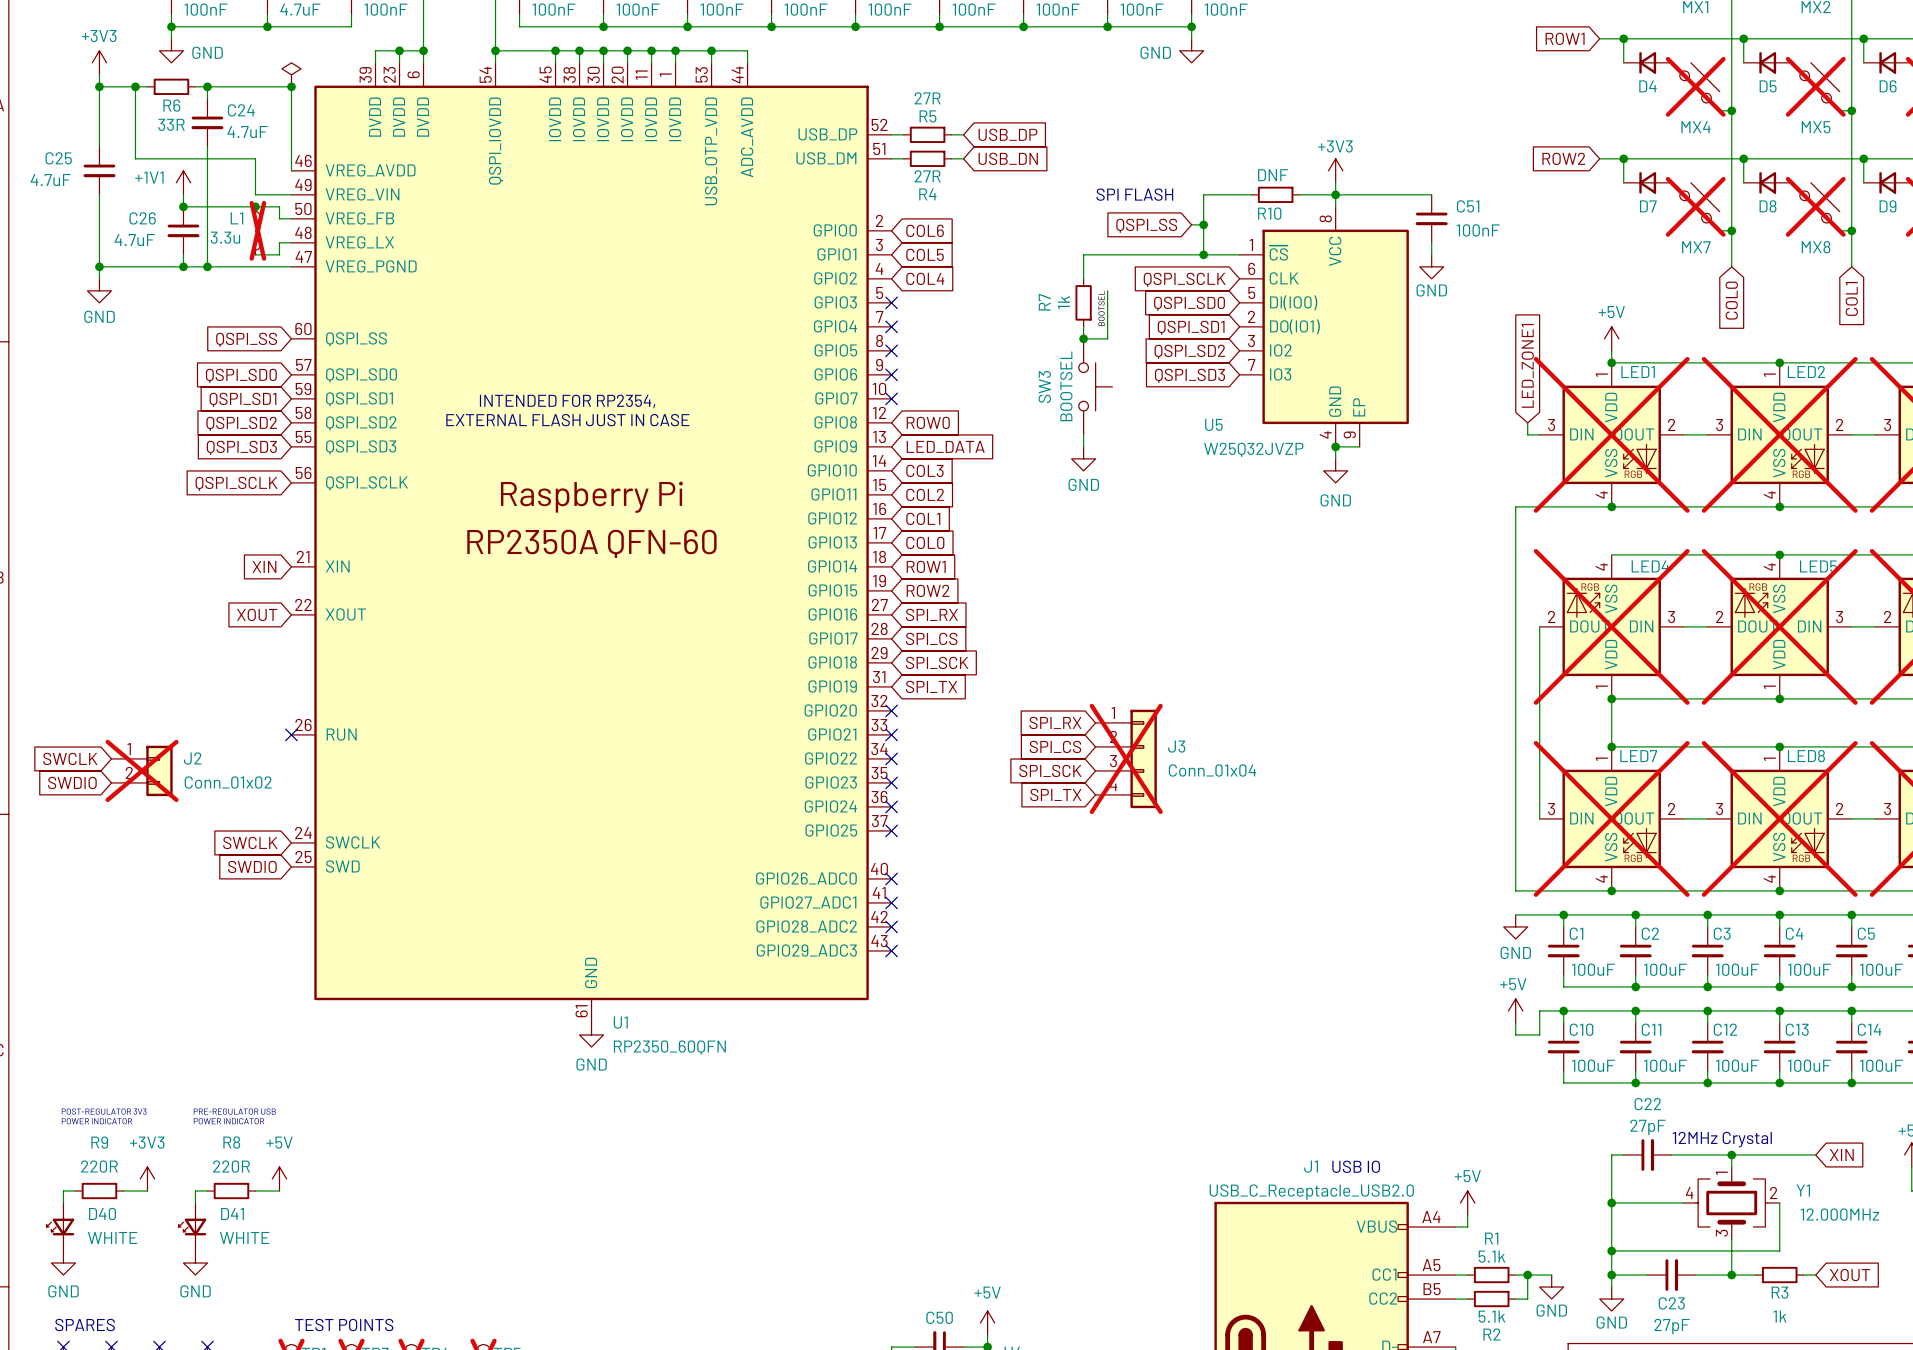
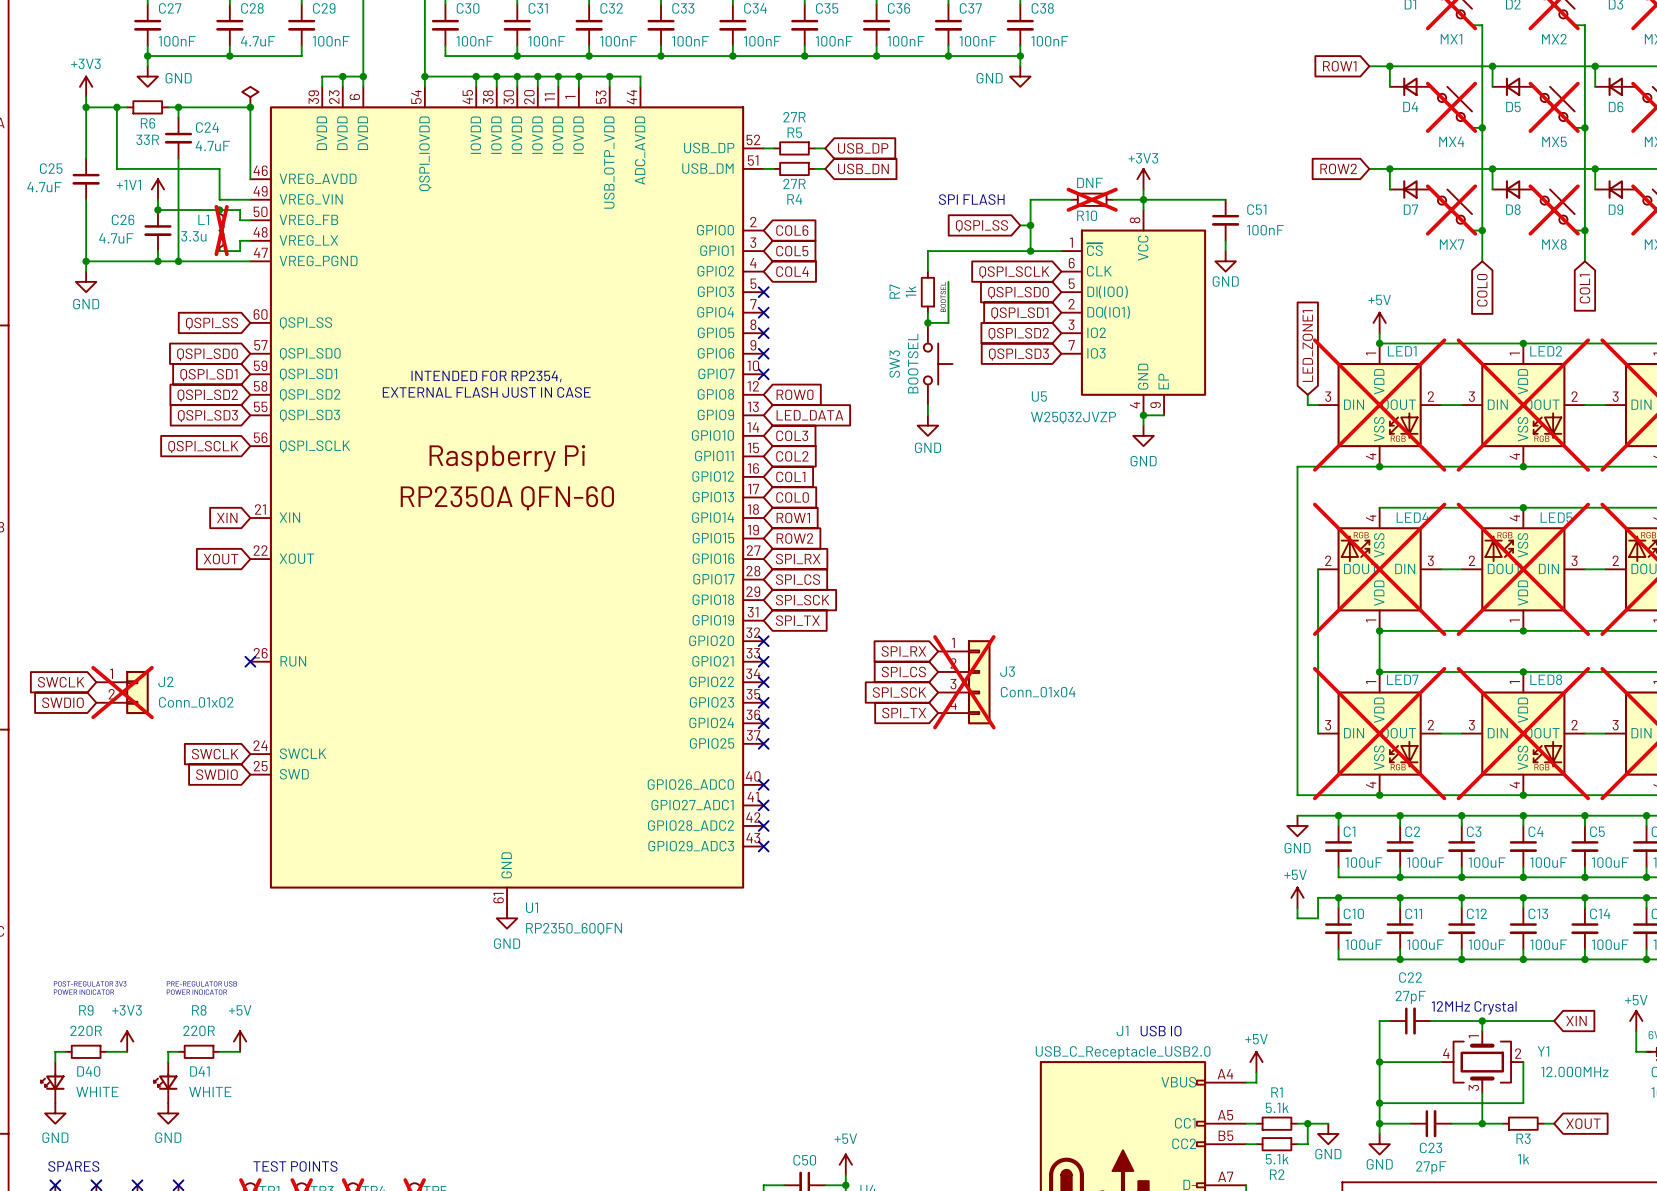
R10 do-not-place cross: none -> (1092, 199)

